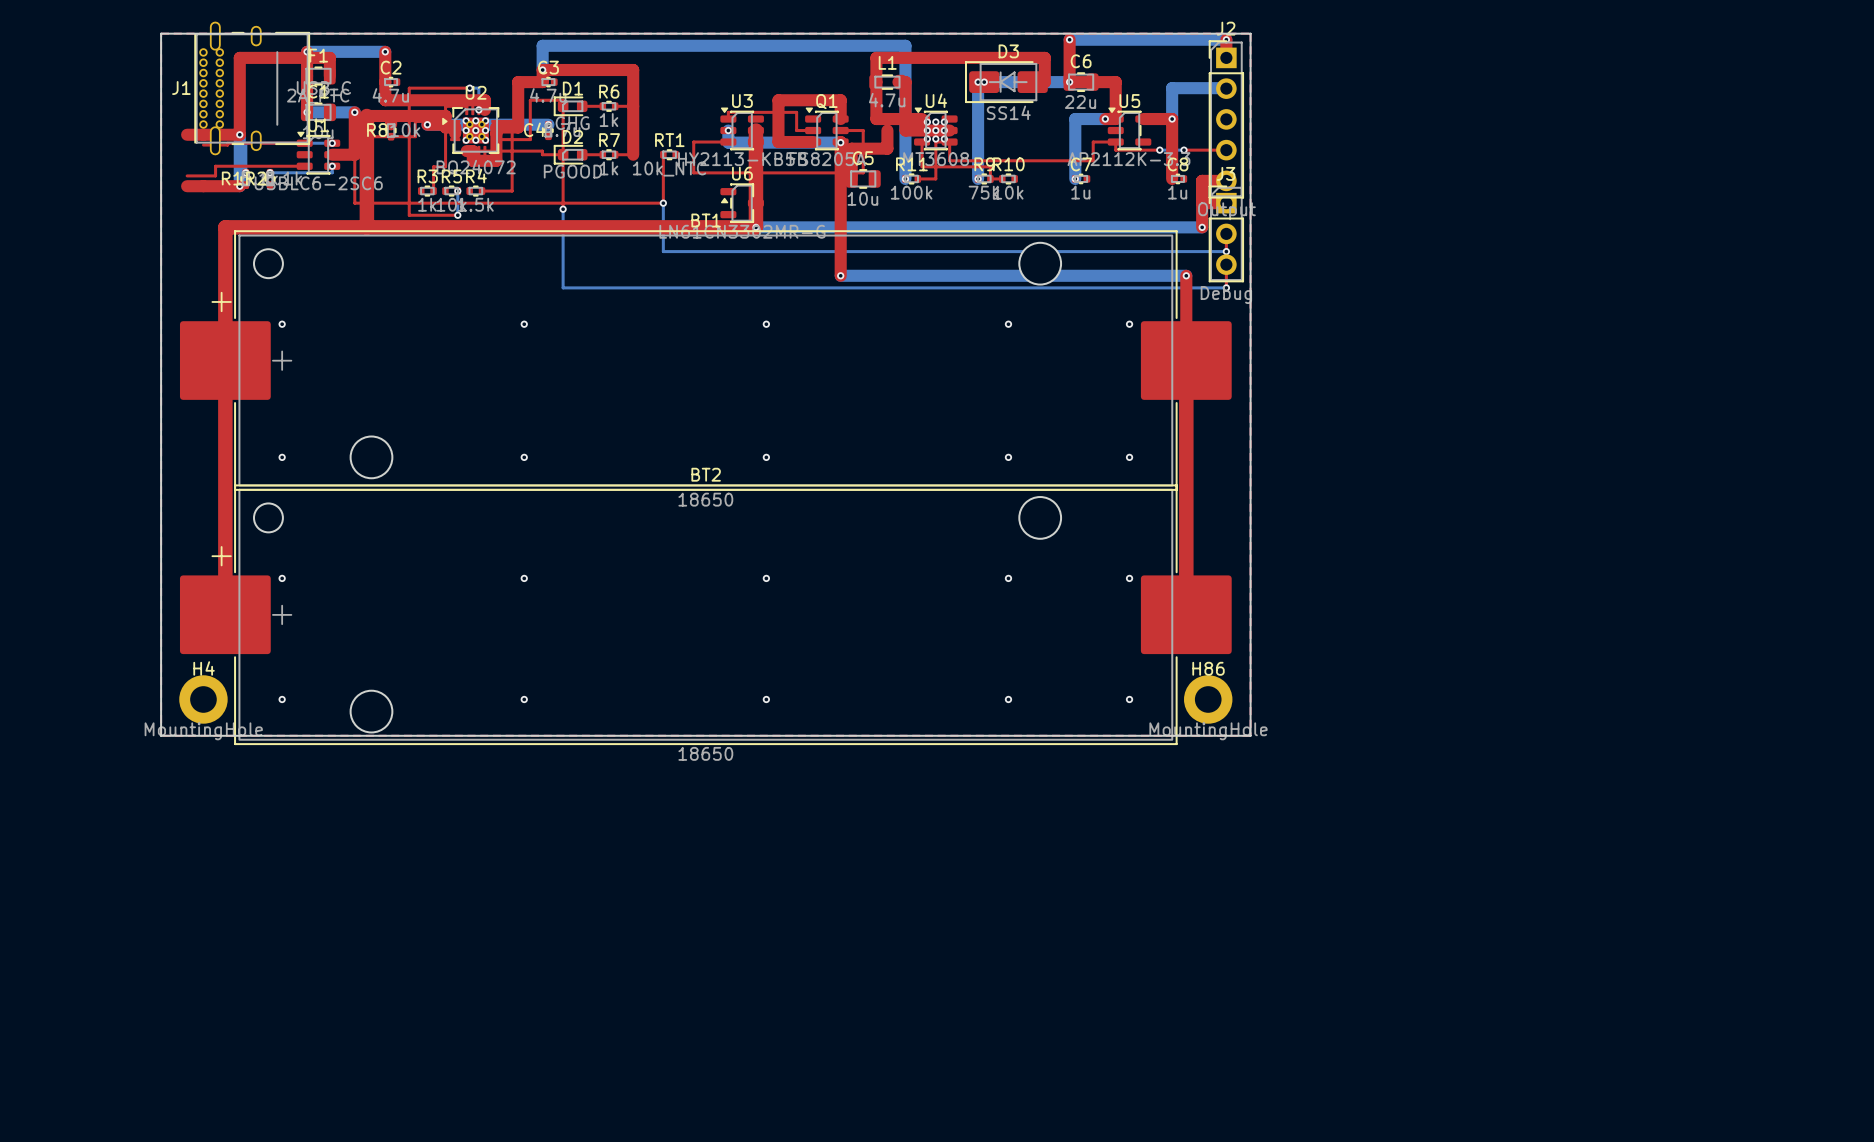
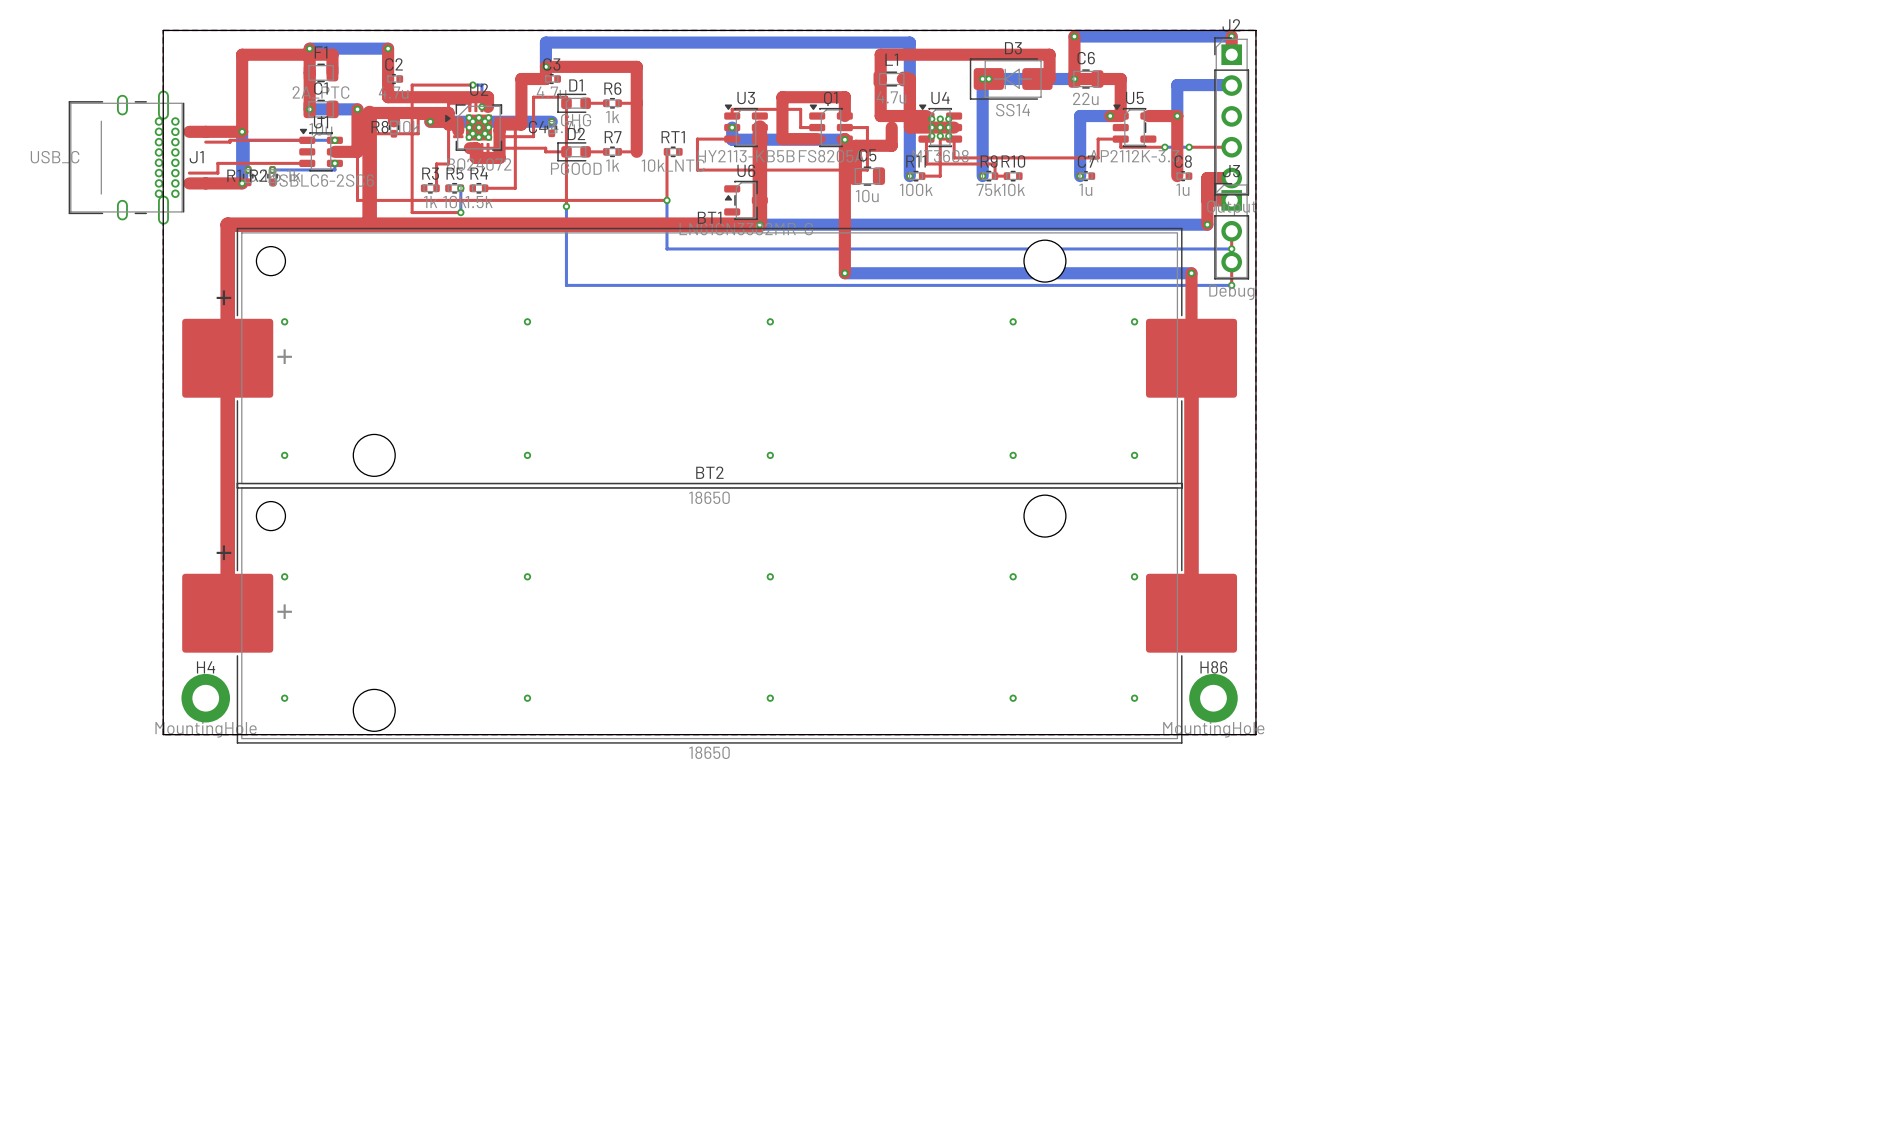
J1 rotation: 0° (252, 88) -> 180° (126, 157)
J1 position: (252, 88) -> (126, 157)

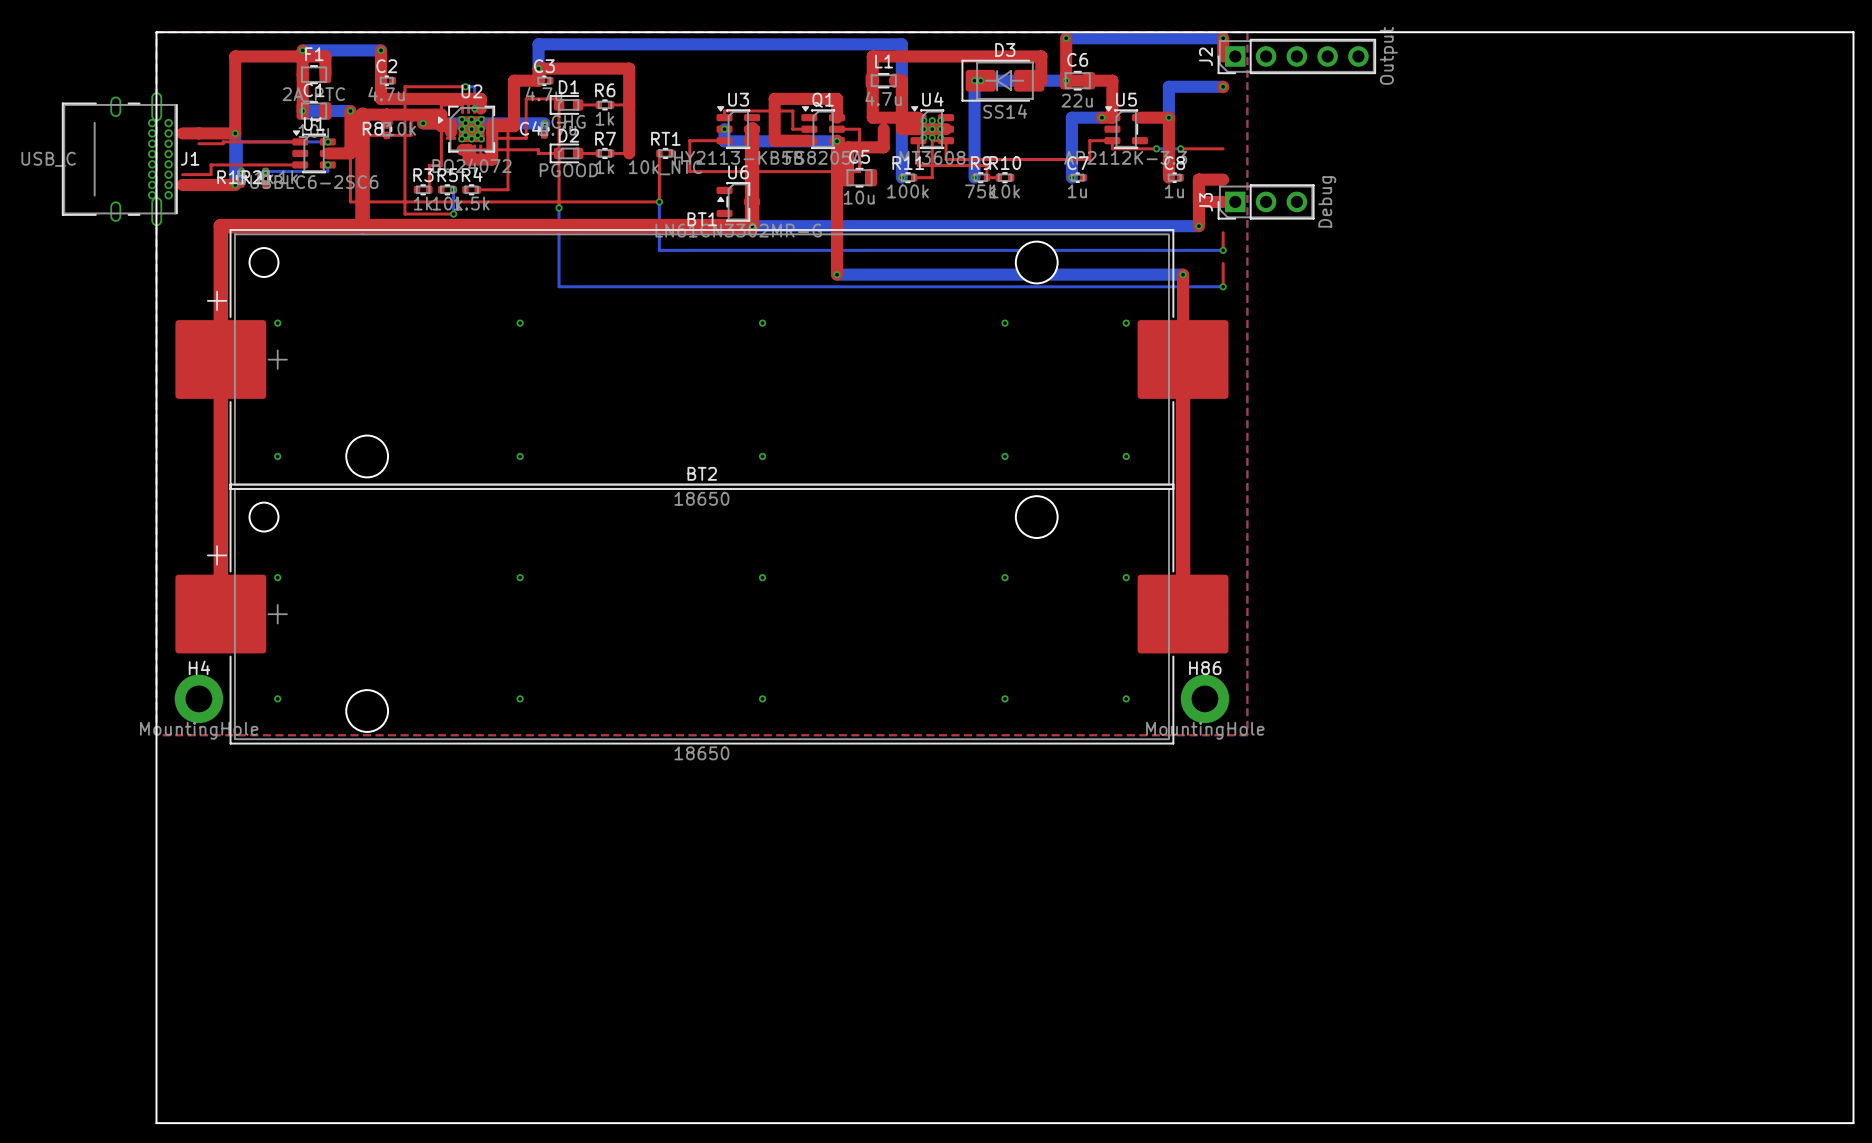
board edge: (1255, 30) (1255, 734) (163, 734) -> (1247, 32) (1853, 32) (1853, 1123) (156, 1123) (156, 735)
J2 rotation: 0° (1231, 116) -> 90° counterclockwise (1296, 56)
J2 position: (1231, 116) -> (1296, 56)
J3 rotation: 0° (1231, 231) -> 90° counterclockwise (1266, 201)

